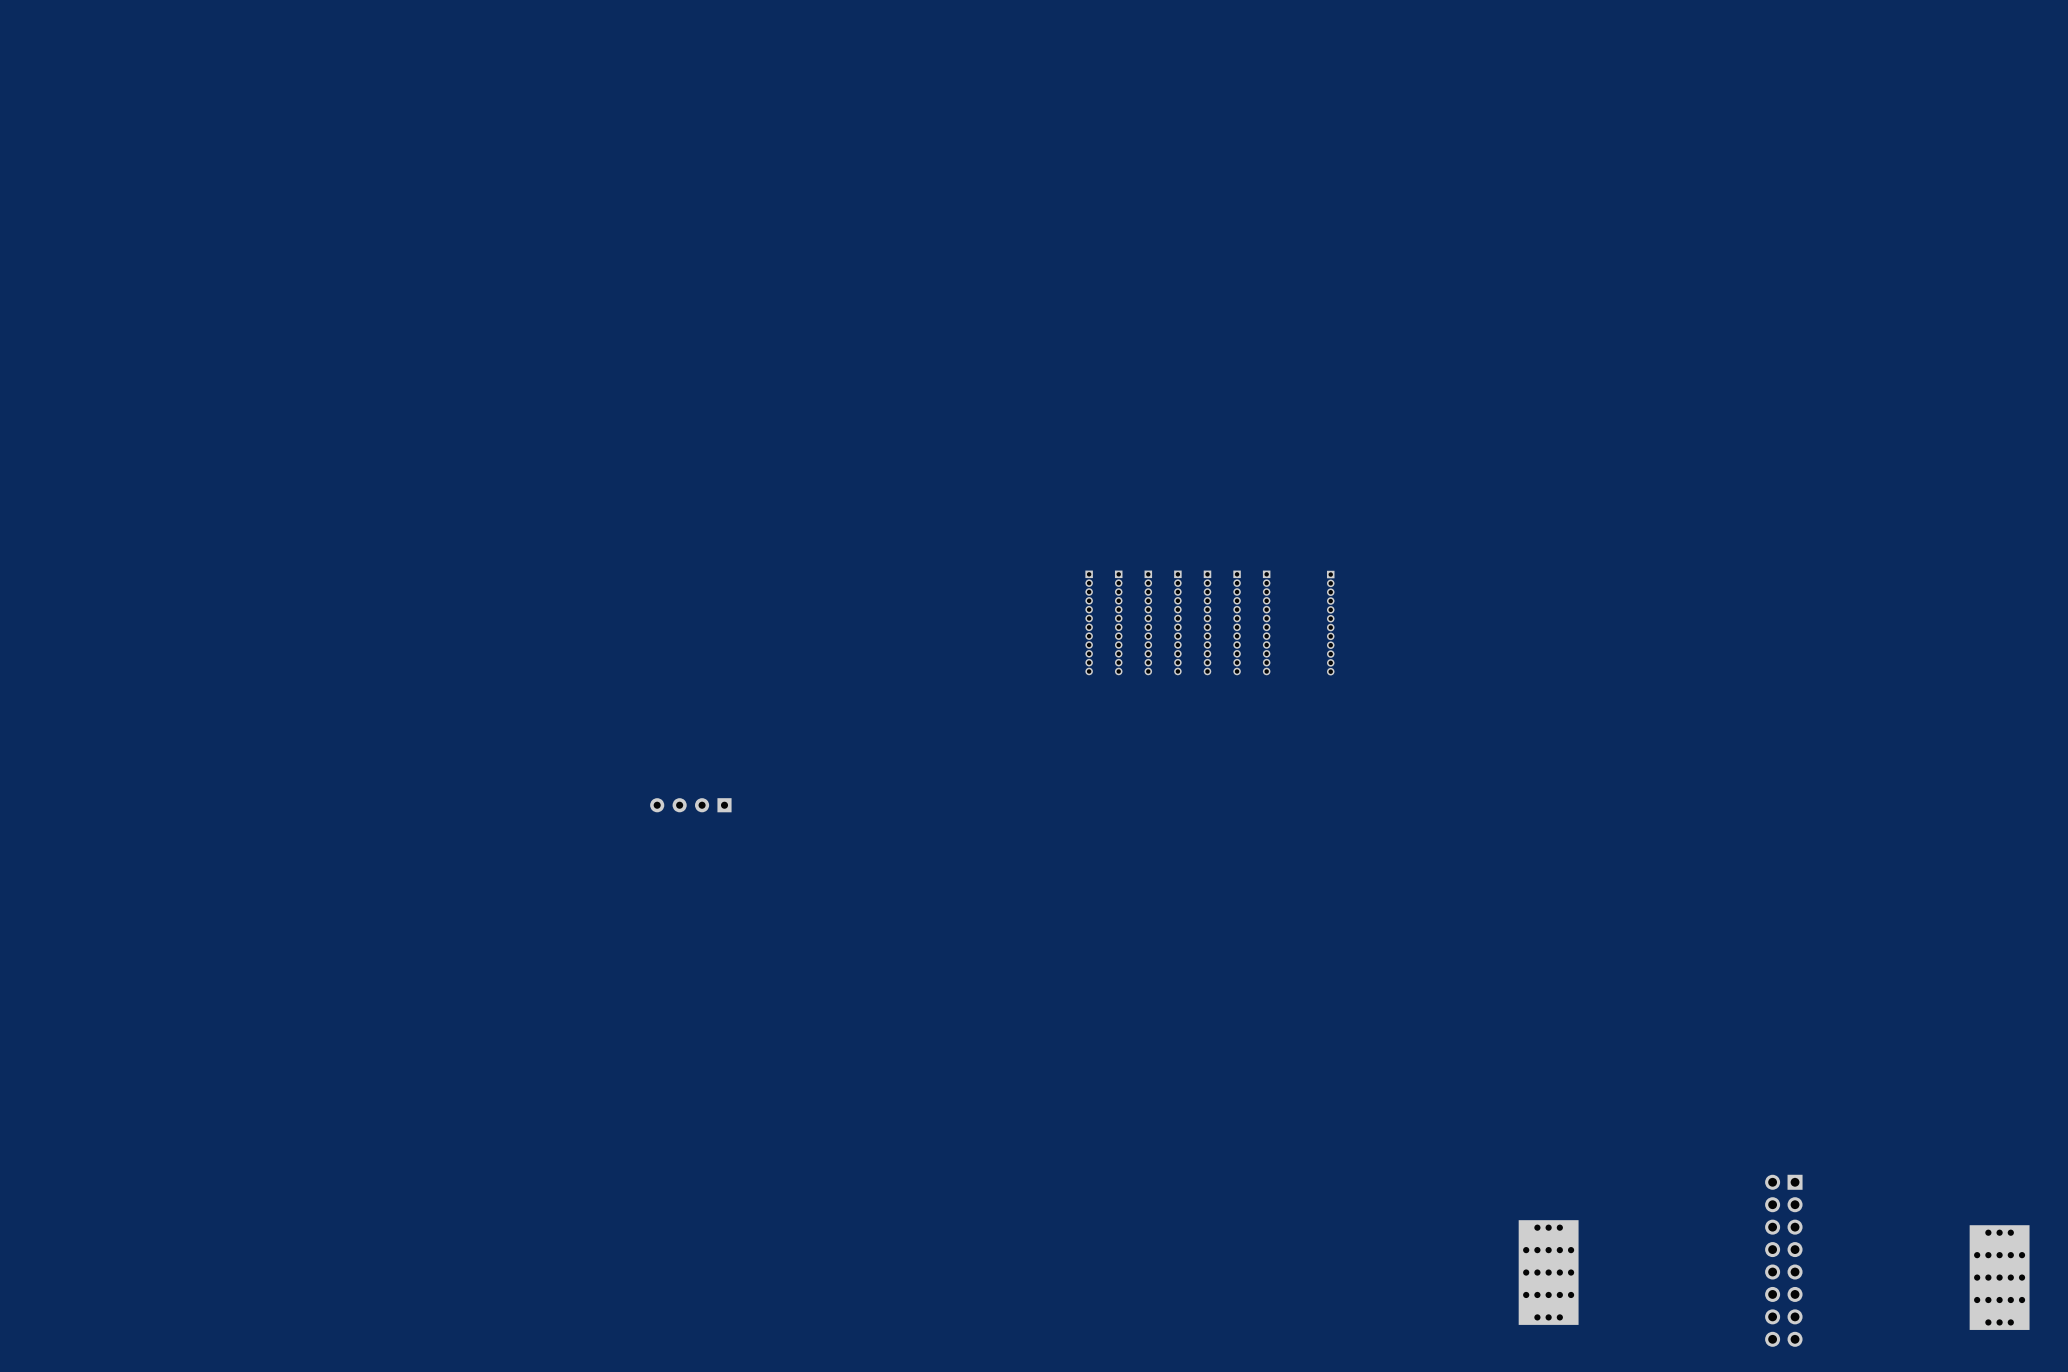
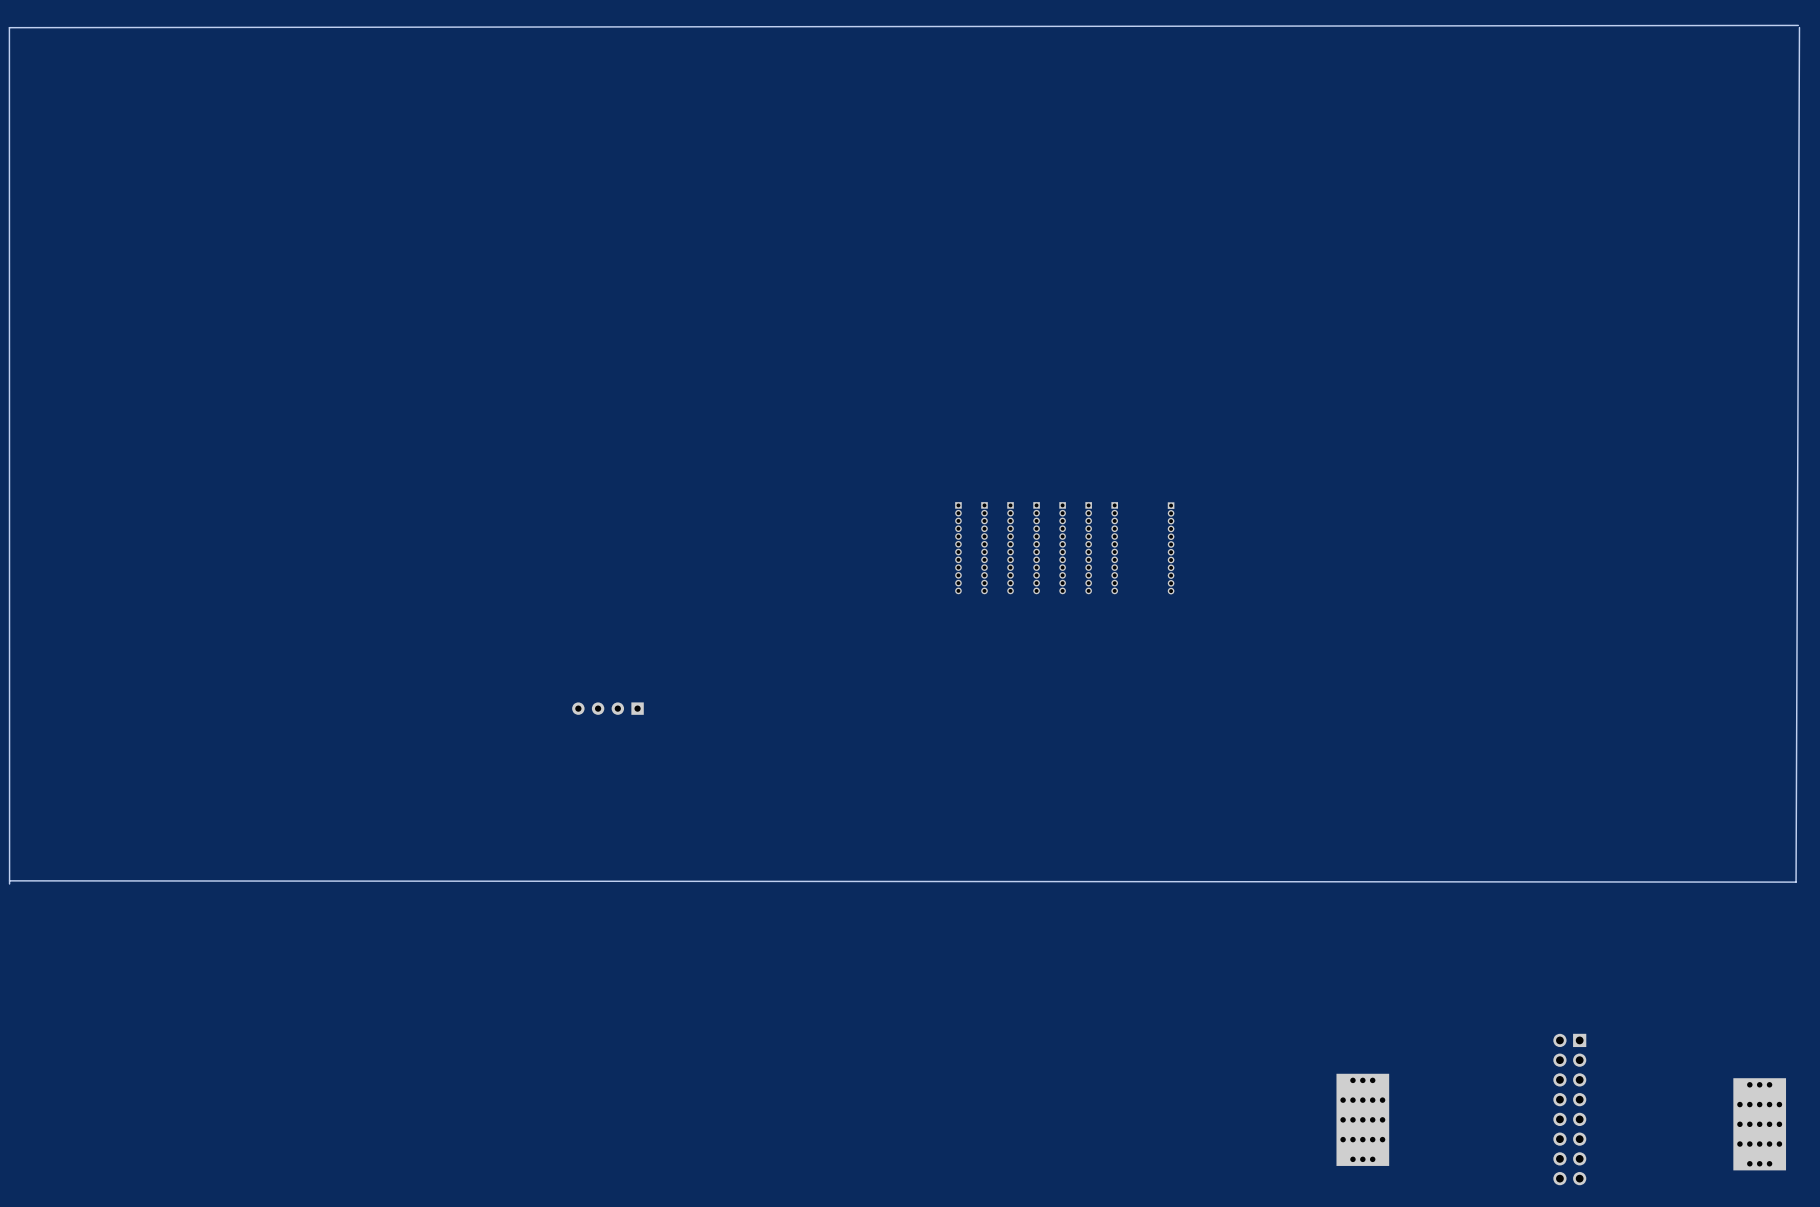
board edge: none -> (1798, 25) (9, 27) (9, 883)
board edge: none -> (1799, 27) (1796, 882) (9, 880)

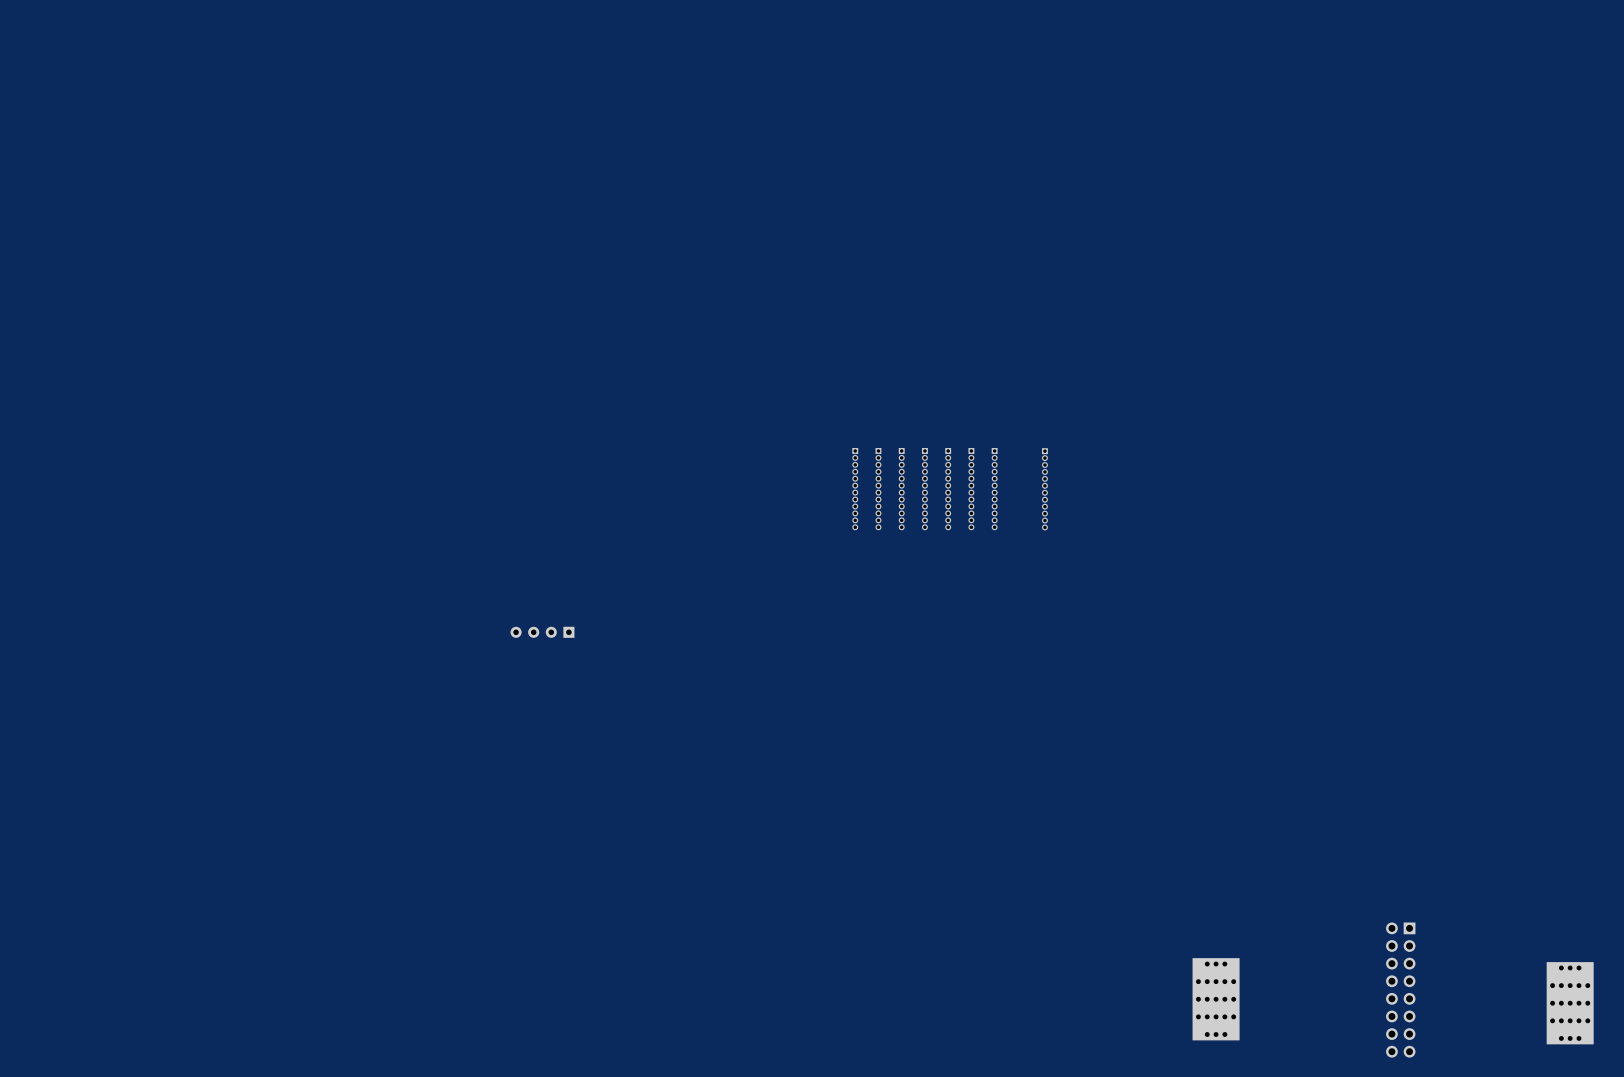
board edge: (1798, 25) (9, 27) (9, 883) -> none
board edge: (1799, 27) (1796, 882) (9, 880) -> none

